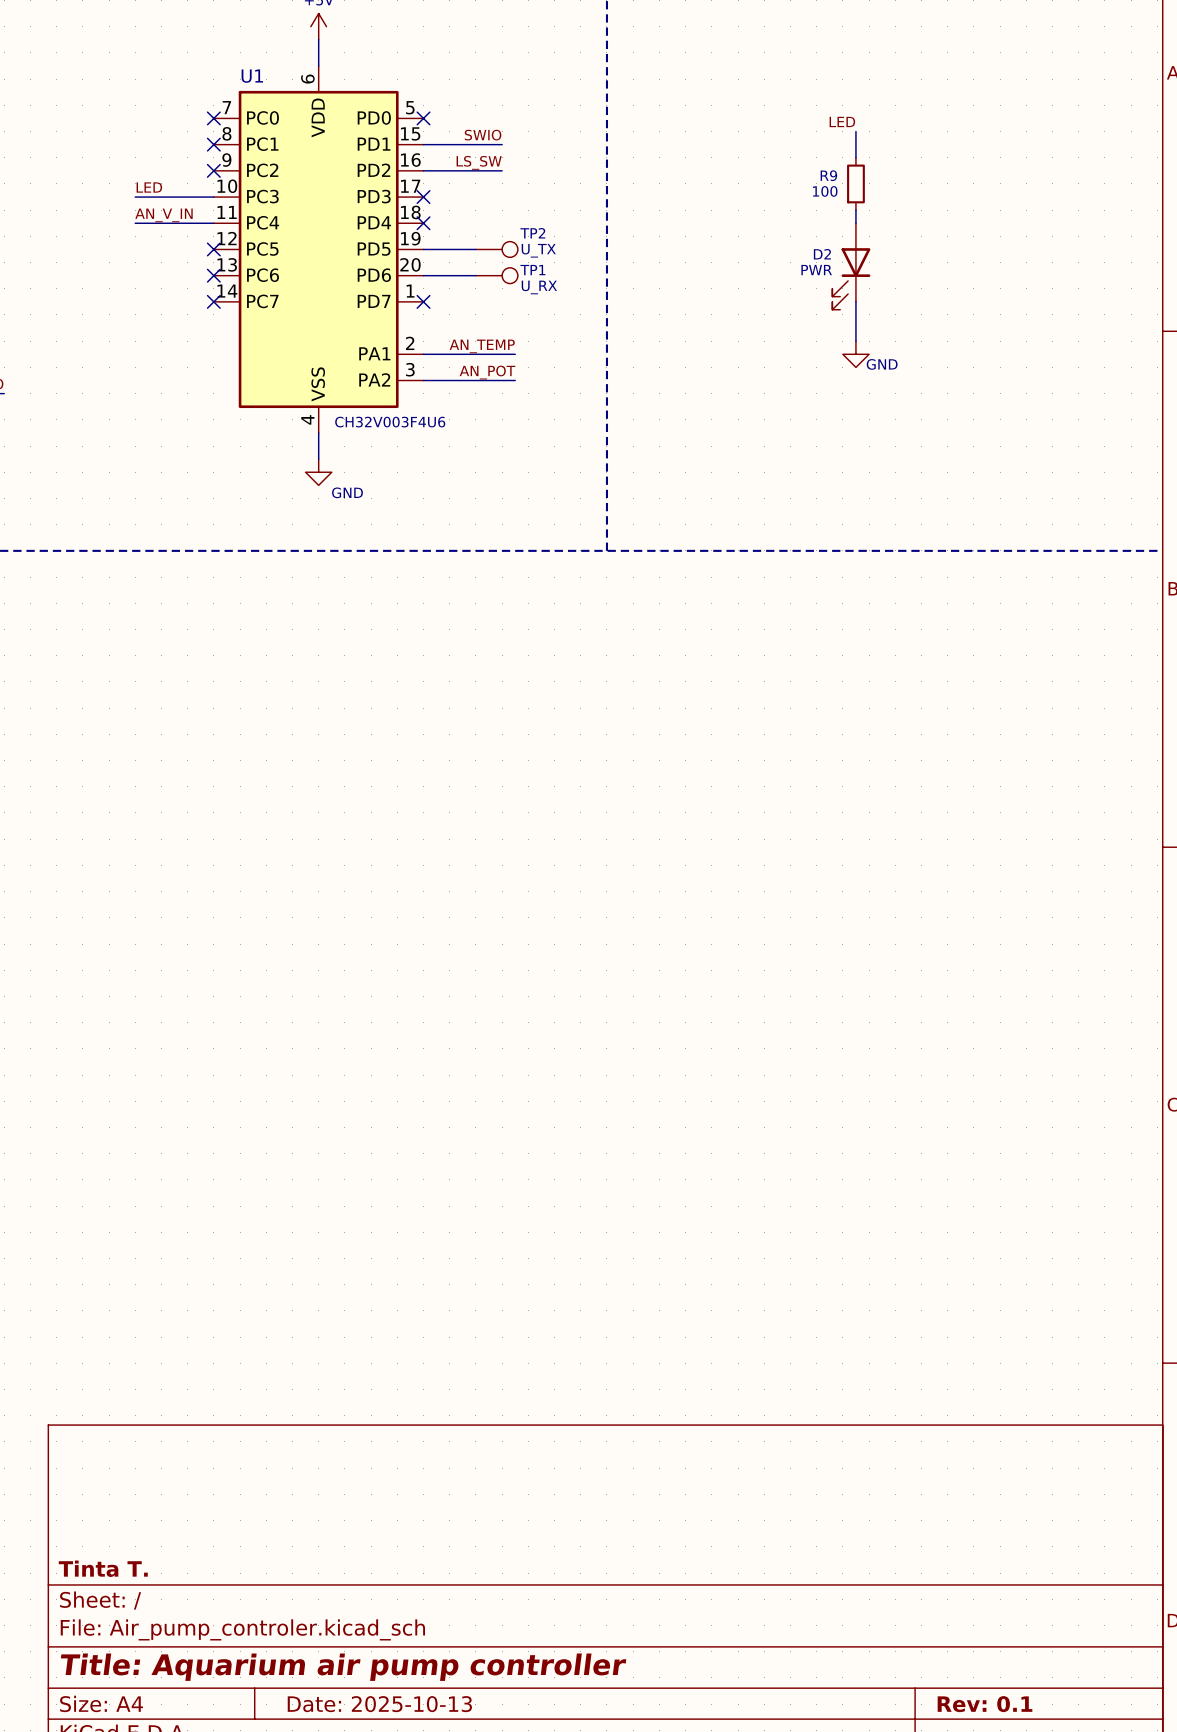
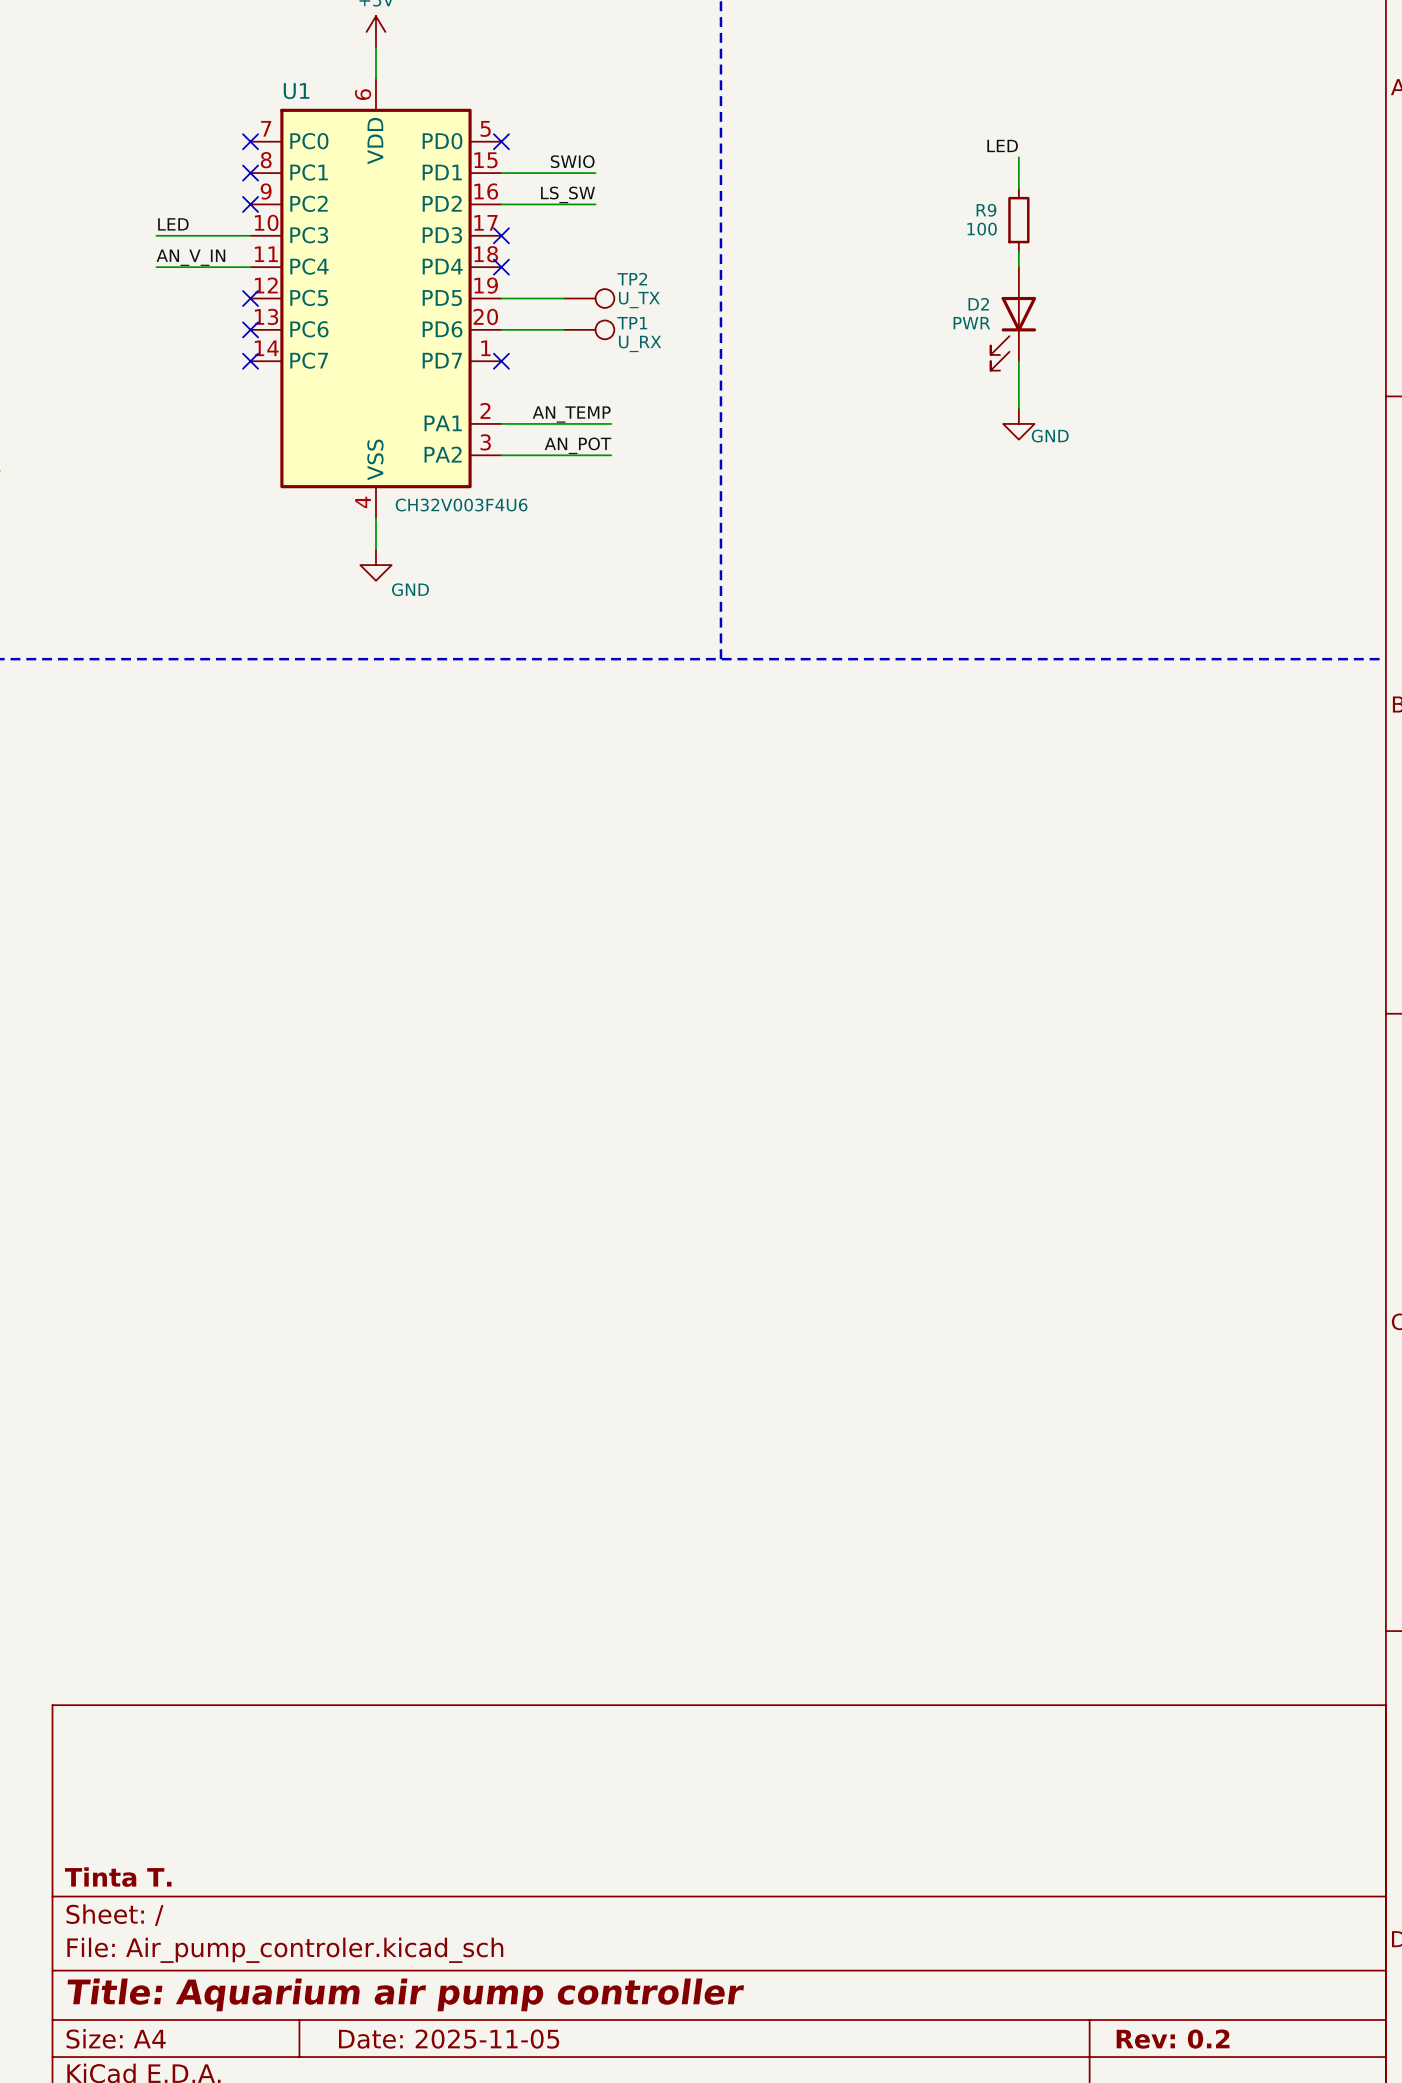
title block: Date: 2025-10-13 (379, 1704) -> Date: 2025-11-05 (449, 2039)
title block: Rev: 0.1 (985, 1704) -> Rev: 0.2 (1173, 2039)

